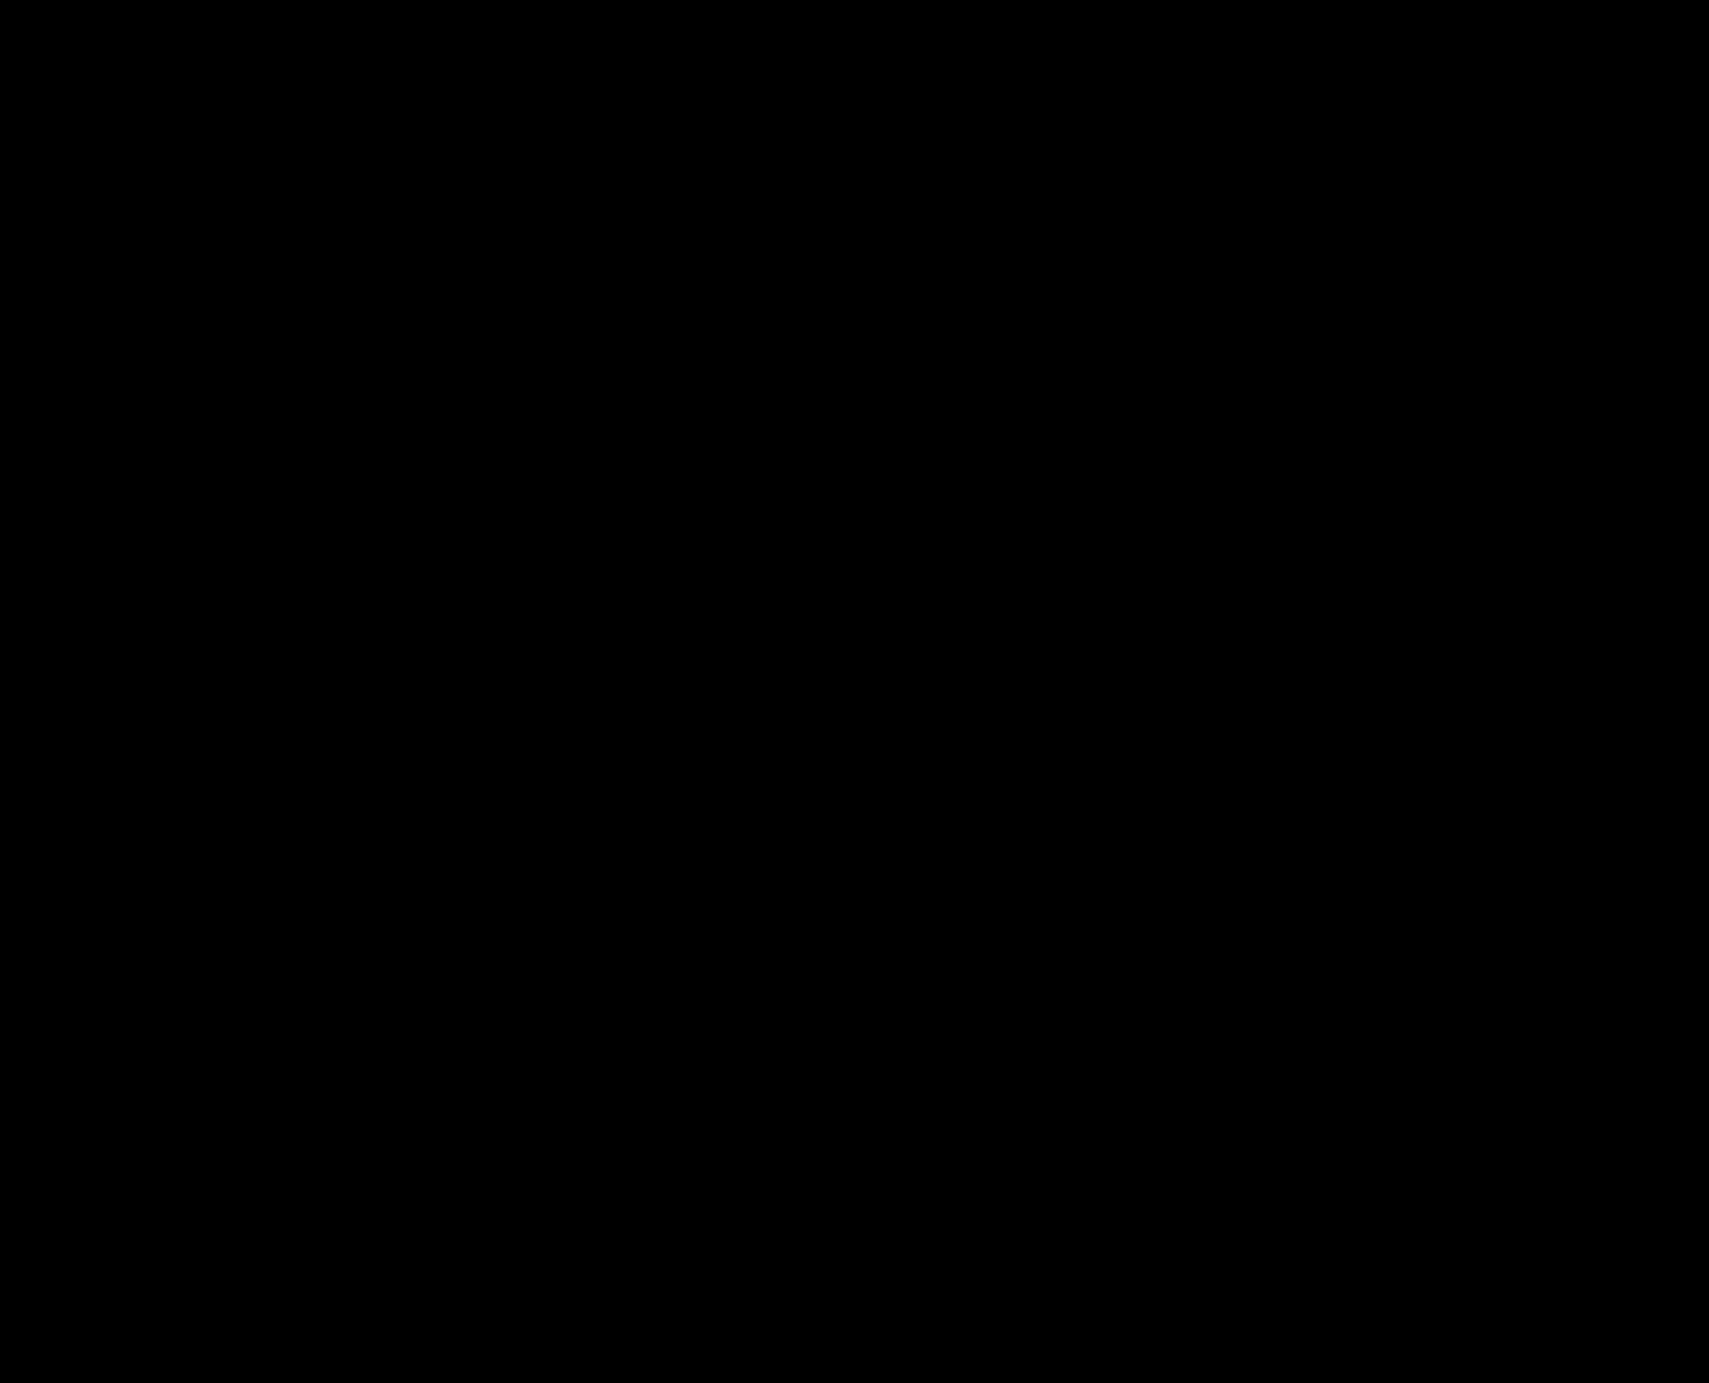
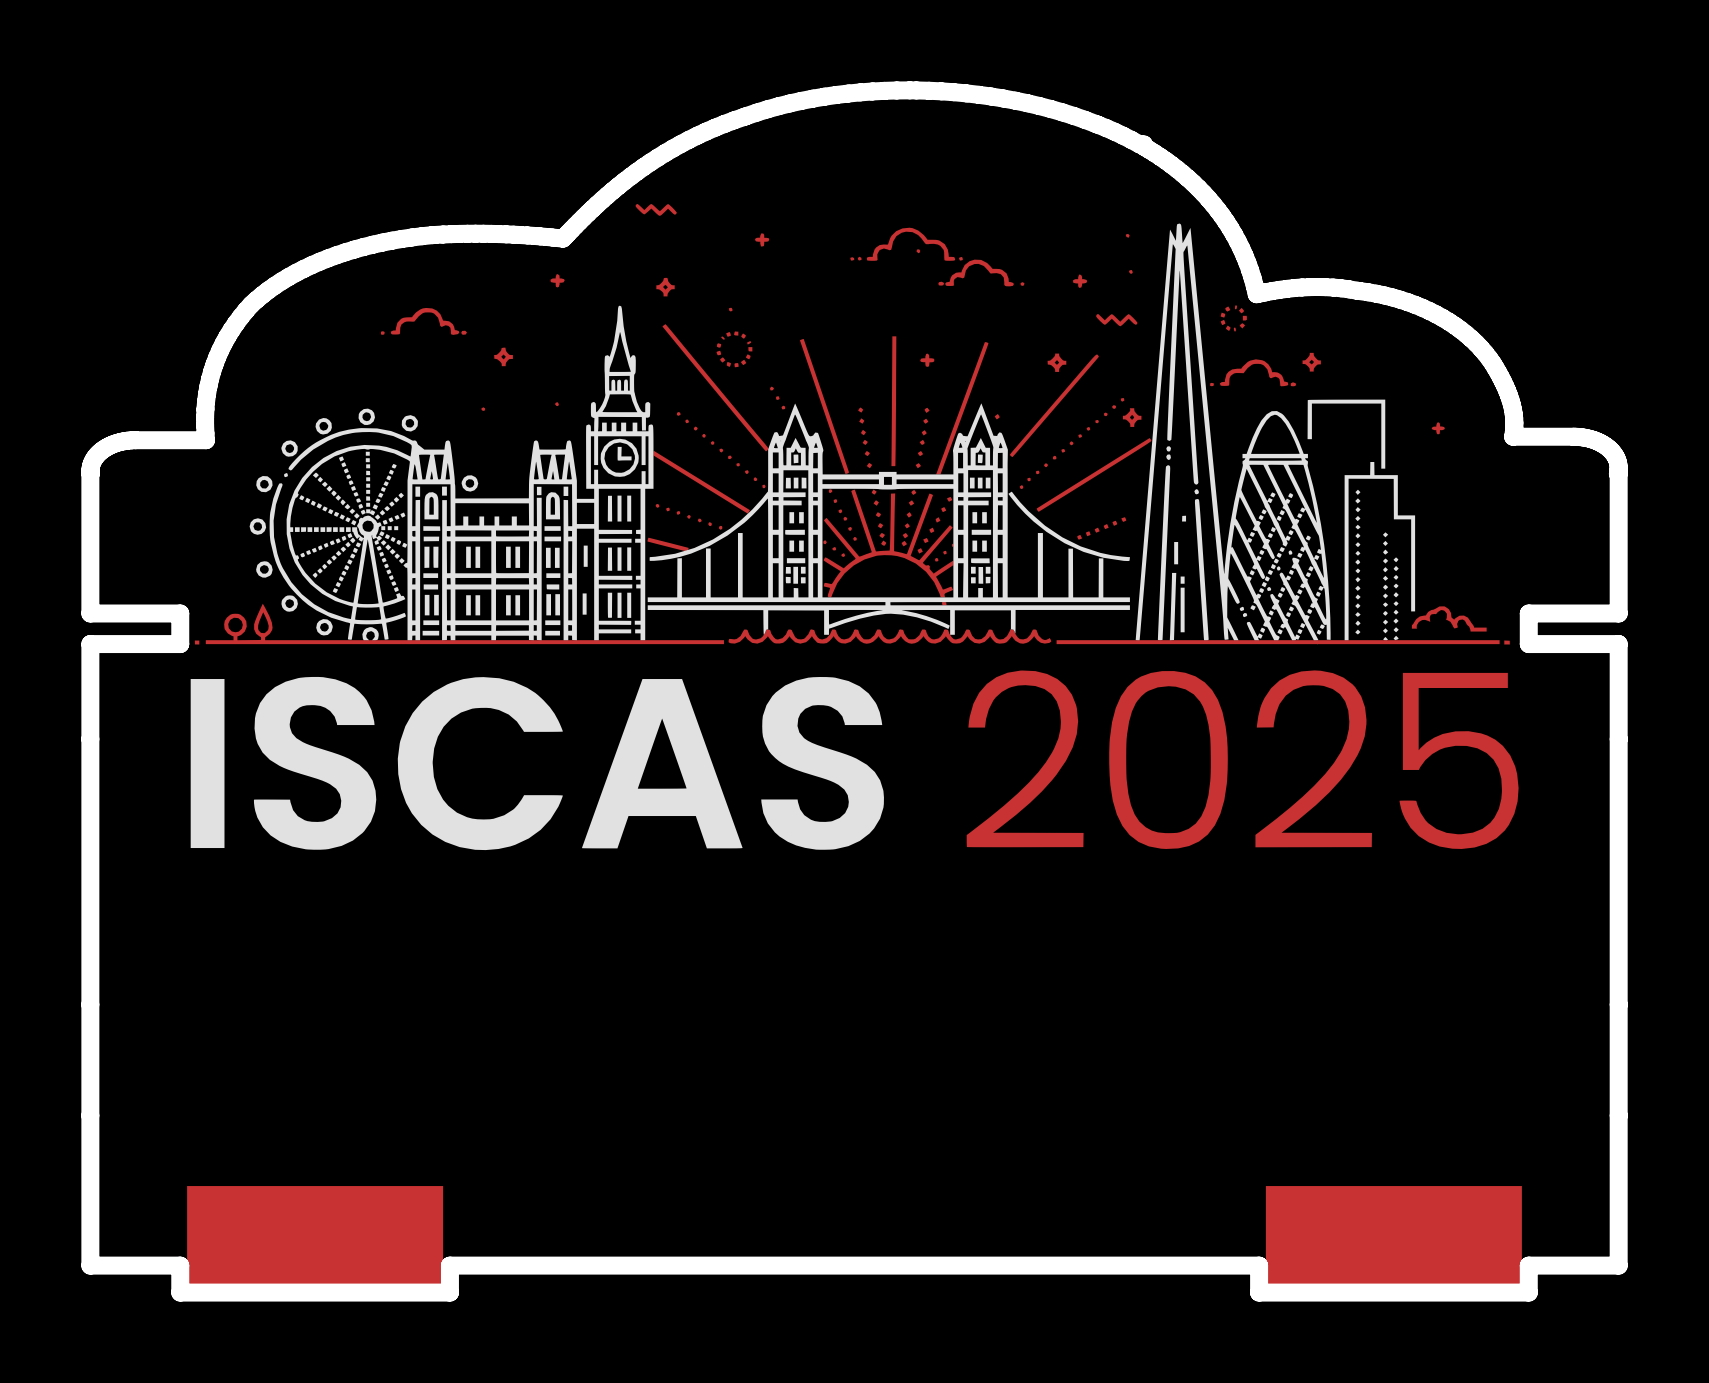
drawing: none -> [187, 203, 1522, 1293]
board edge: none -> (90, 473) (90, 613) (180, 613) (180, 644) (90, 644) (90, 1265) (180, 1265) (180, 1292) (449, 1292) (449, 1265) (1259, 1265) (1259, 1292) (1528, 1292) (1528, 1265) (1618, 1265) (1618, 644) (1528, 644) (1528, 613) (1618, 613) (1617, 459) (1606, 446) (1586, 438) (1513, 436) (1514, 422) (1511, 404) (1505, 386) (1493, 363) (1466, 334) (1429, 310) (1392, 297) (1341, 288) (1301, 287) (1256, 294) (1241, 248) (1217, 209) (1188, 178) (1143, 146) (1143, 144) (1139, 144) (1098, 124) (1051, 109) (1003, 98) (953, 92) (896, 90) (848, 93) (801, 100) (756, 112) (697, 135) (650, 162) (607, 195) (562, 238) (483, 233) (411, 237) (345, 252) (296, 272) (268, 290) (251, 304) (235, 323) (223, 343) (214, 364) (208, 386) (205, 409) (205, 440) (131, 440) (116, 443) (97, 454) (91, 464) (90, 473)

